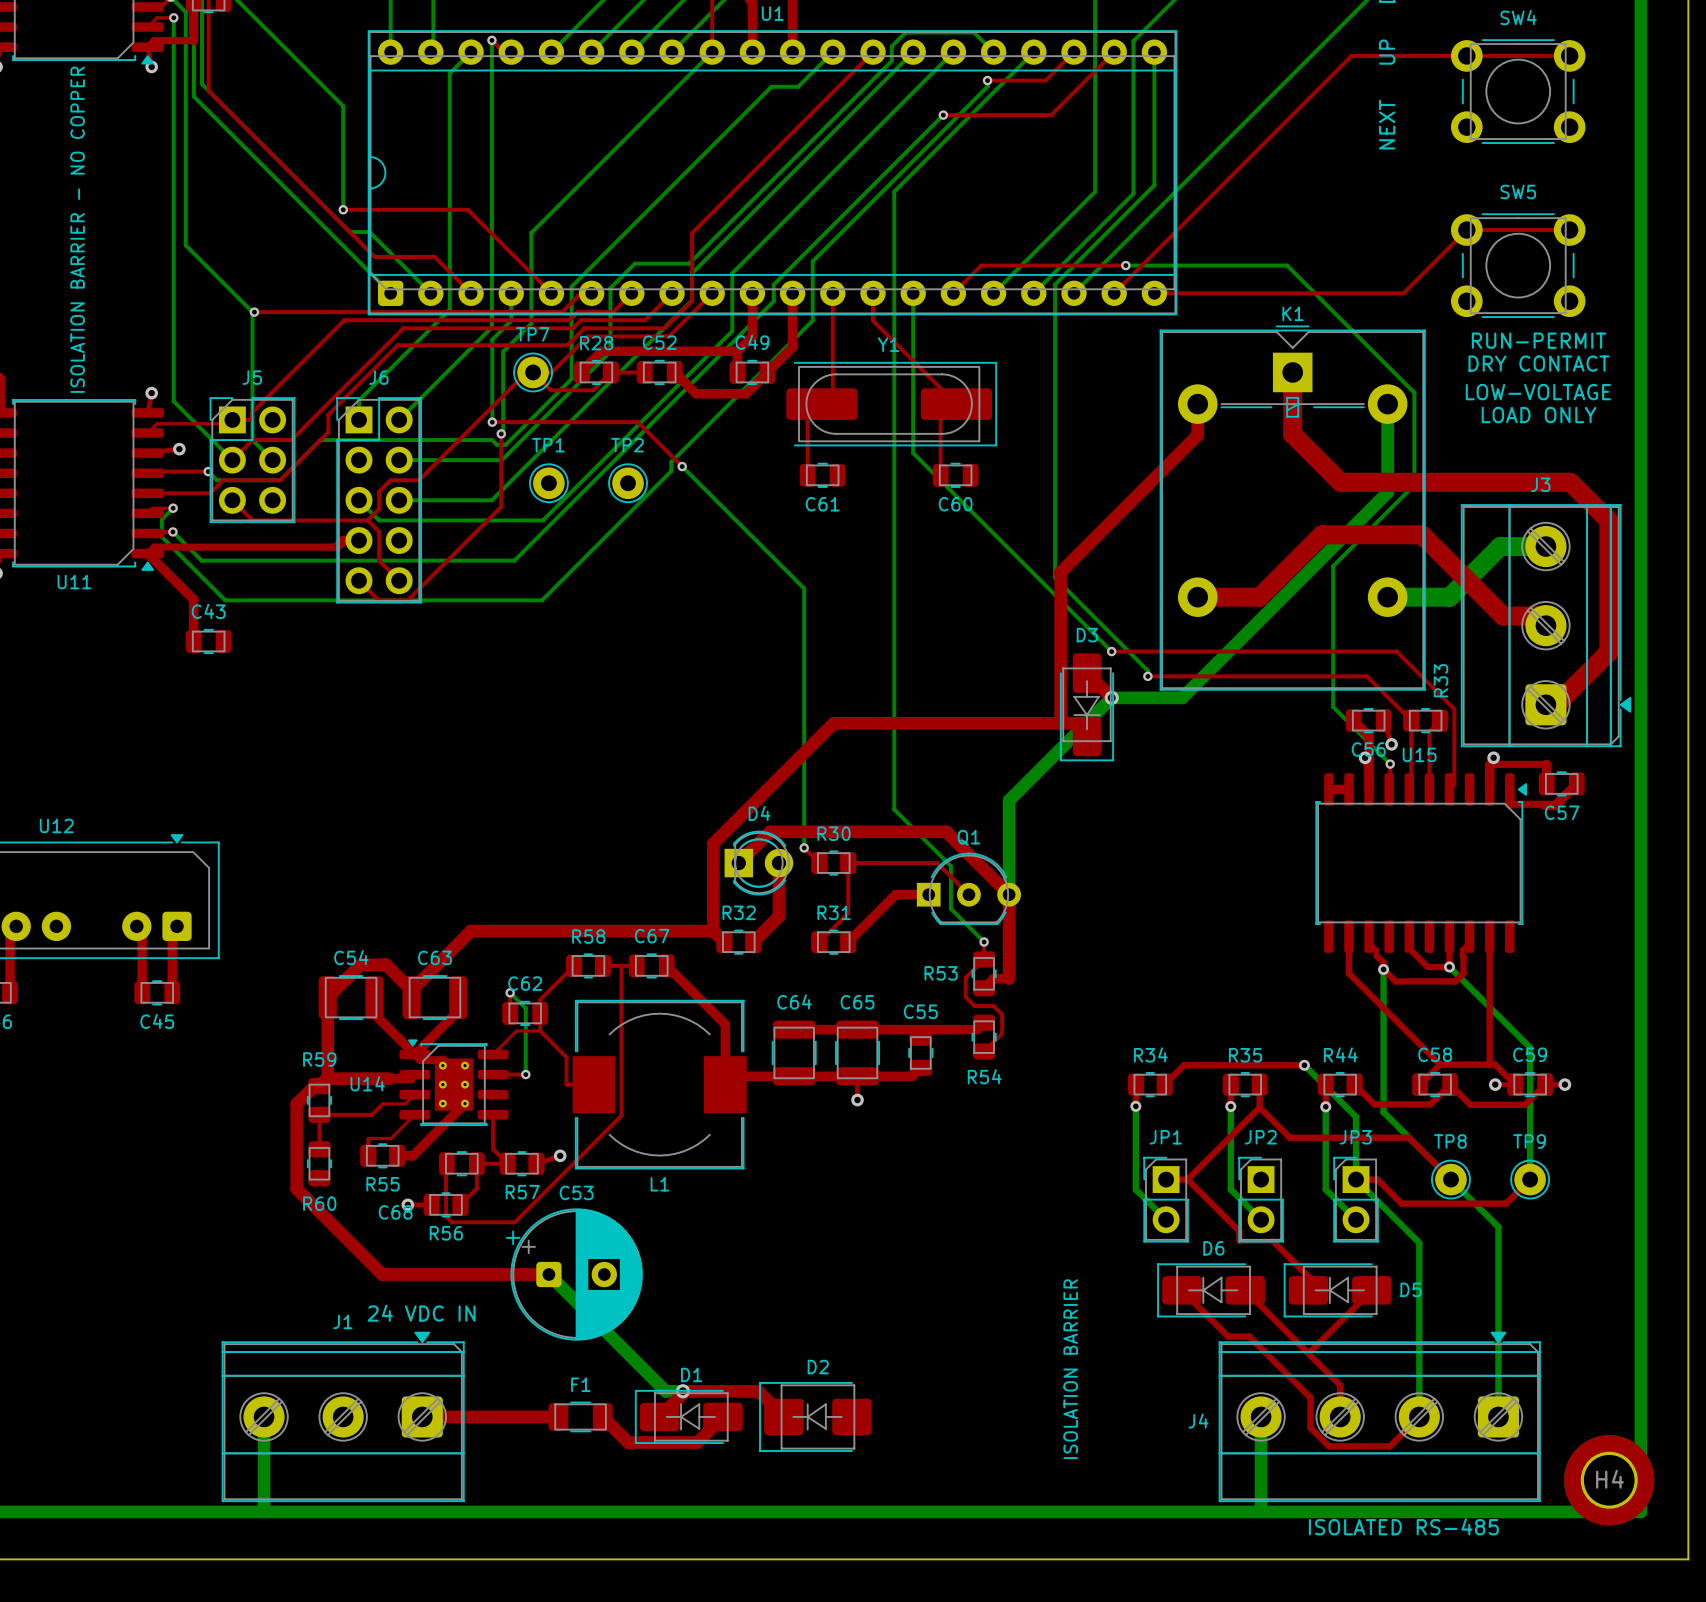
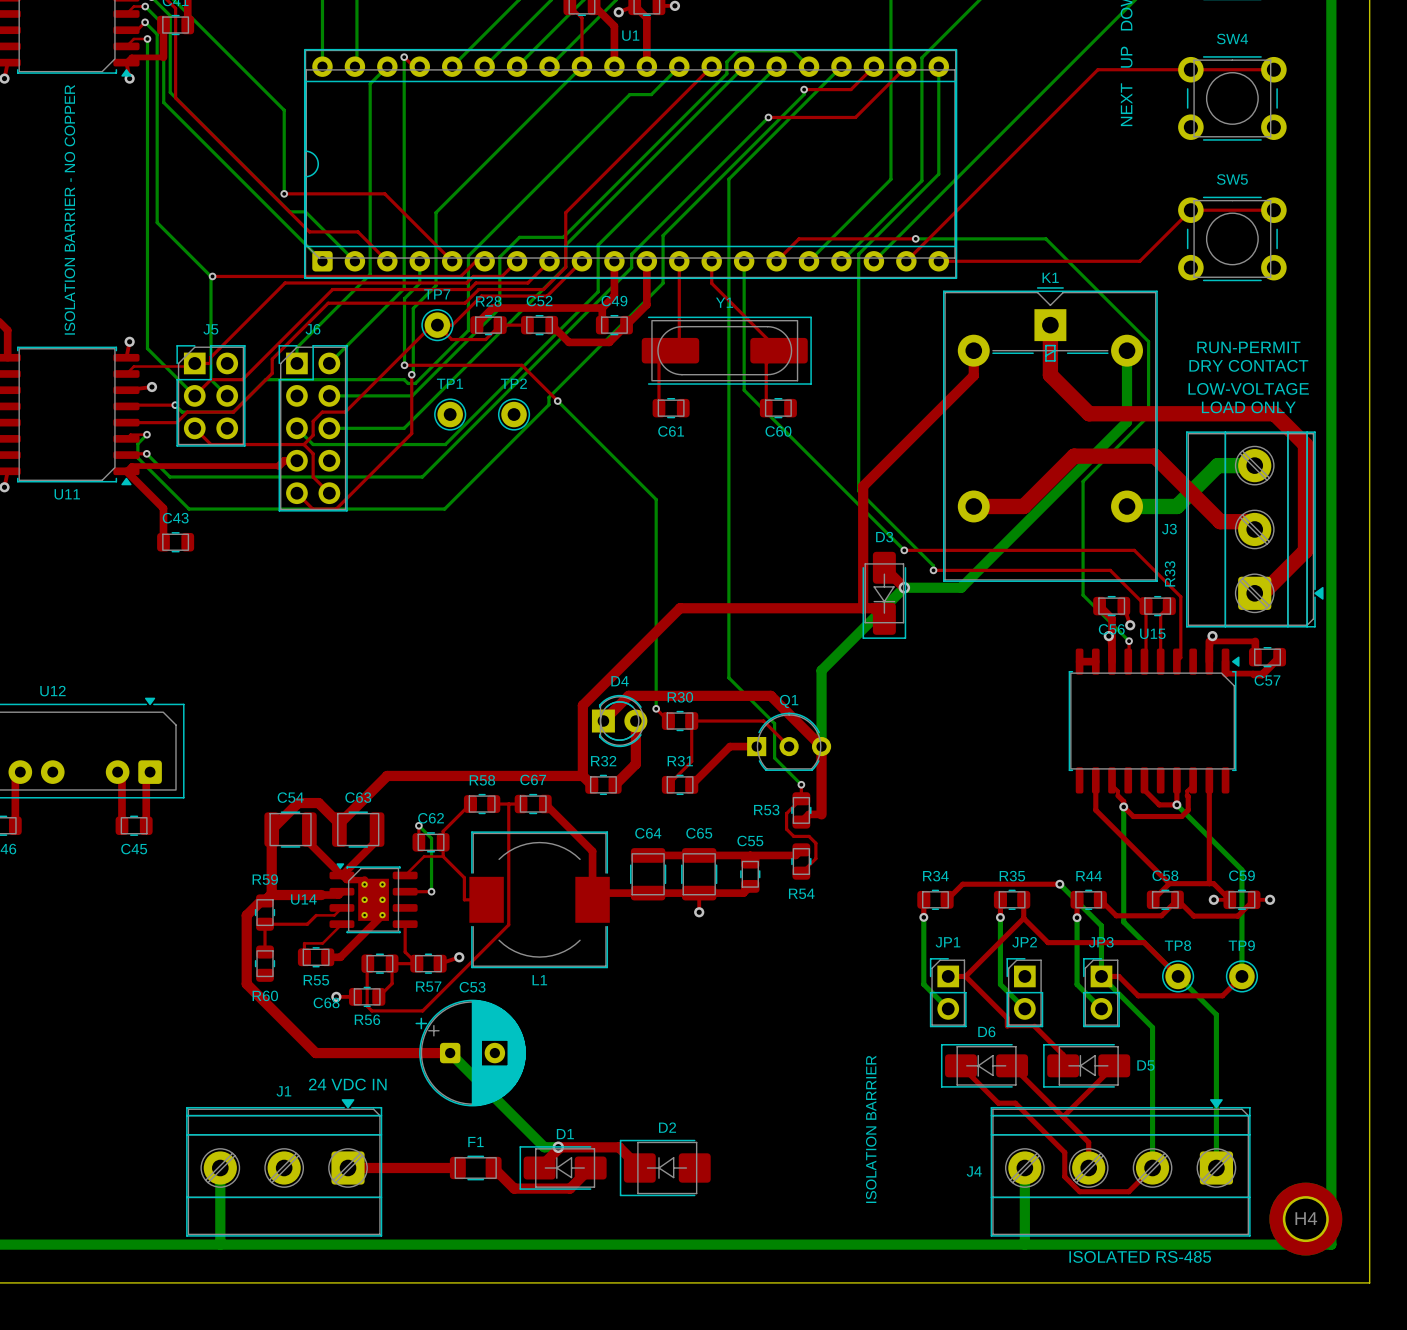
text position: RUN-PERMIT (1539, 340) -> RUN-PERMIT (1248, 347)
text position: DRY CONTACT (1539, 363) -> DRY CONTACT (1248, 365)
text position: LOW-VOLTAGE (1538, 392) -> LOW-VOLTAGE (1248, 388)
text position: LOAD ONLY (1539, 415) -> LOAD ONLY (1248, 407)
J3 name position: J3 (1540, 484) -> J3 (1169, 529)

